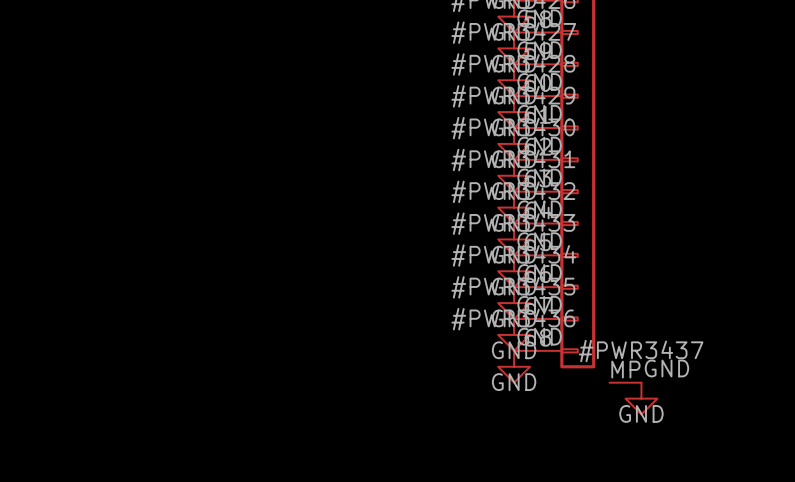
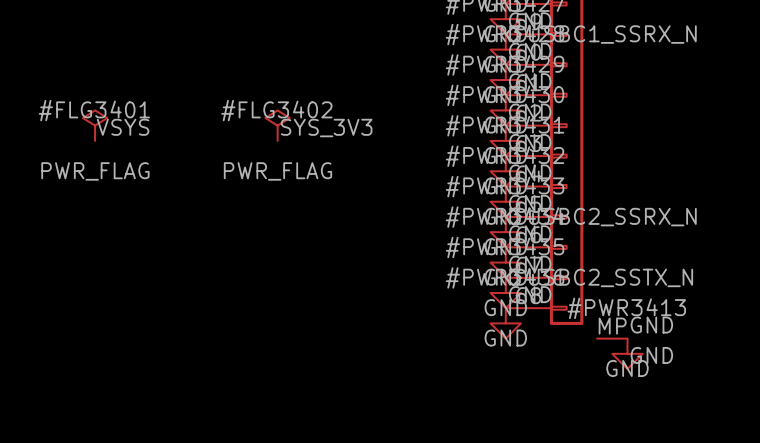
hierarchical label: none -> USBC1_SSRX_N (612, 34)
#FLG3401: none -> PWR_FLAG (95, 125)
#FLG3402: none -> PWR_FLAG (277, 125)
label: none -> VSYS (123, 127)
label: none -> SYS_3V3 (326, 128)
hierarchical label: none -> USBC2_SSRX_N (612, 217)
hierarchical label: none -> USBC2_SSTX_N (611, 277)
#PWR3437 name: #PWR3437 (641, 351) -> #PWR3413 (626, 308)
label: none -> GND (651, 355)

